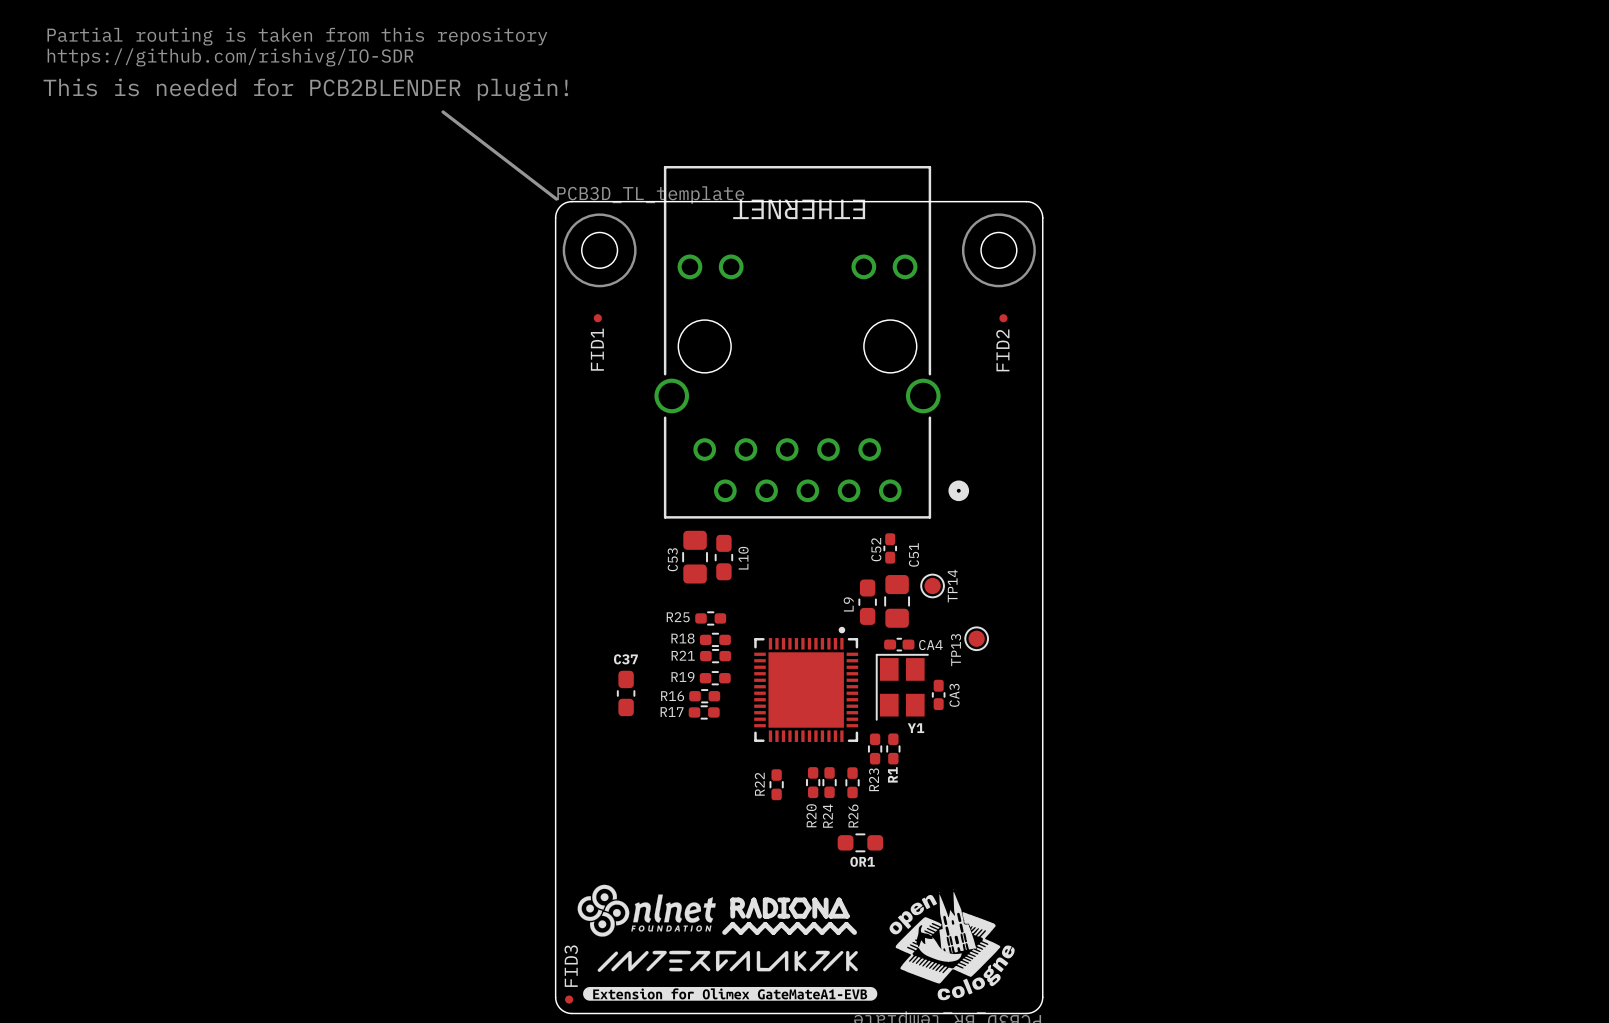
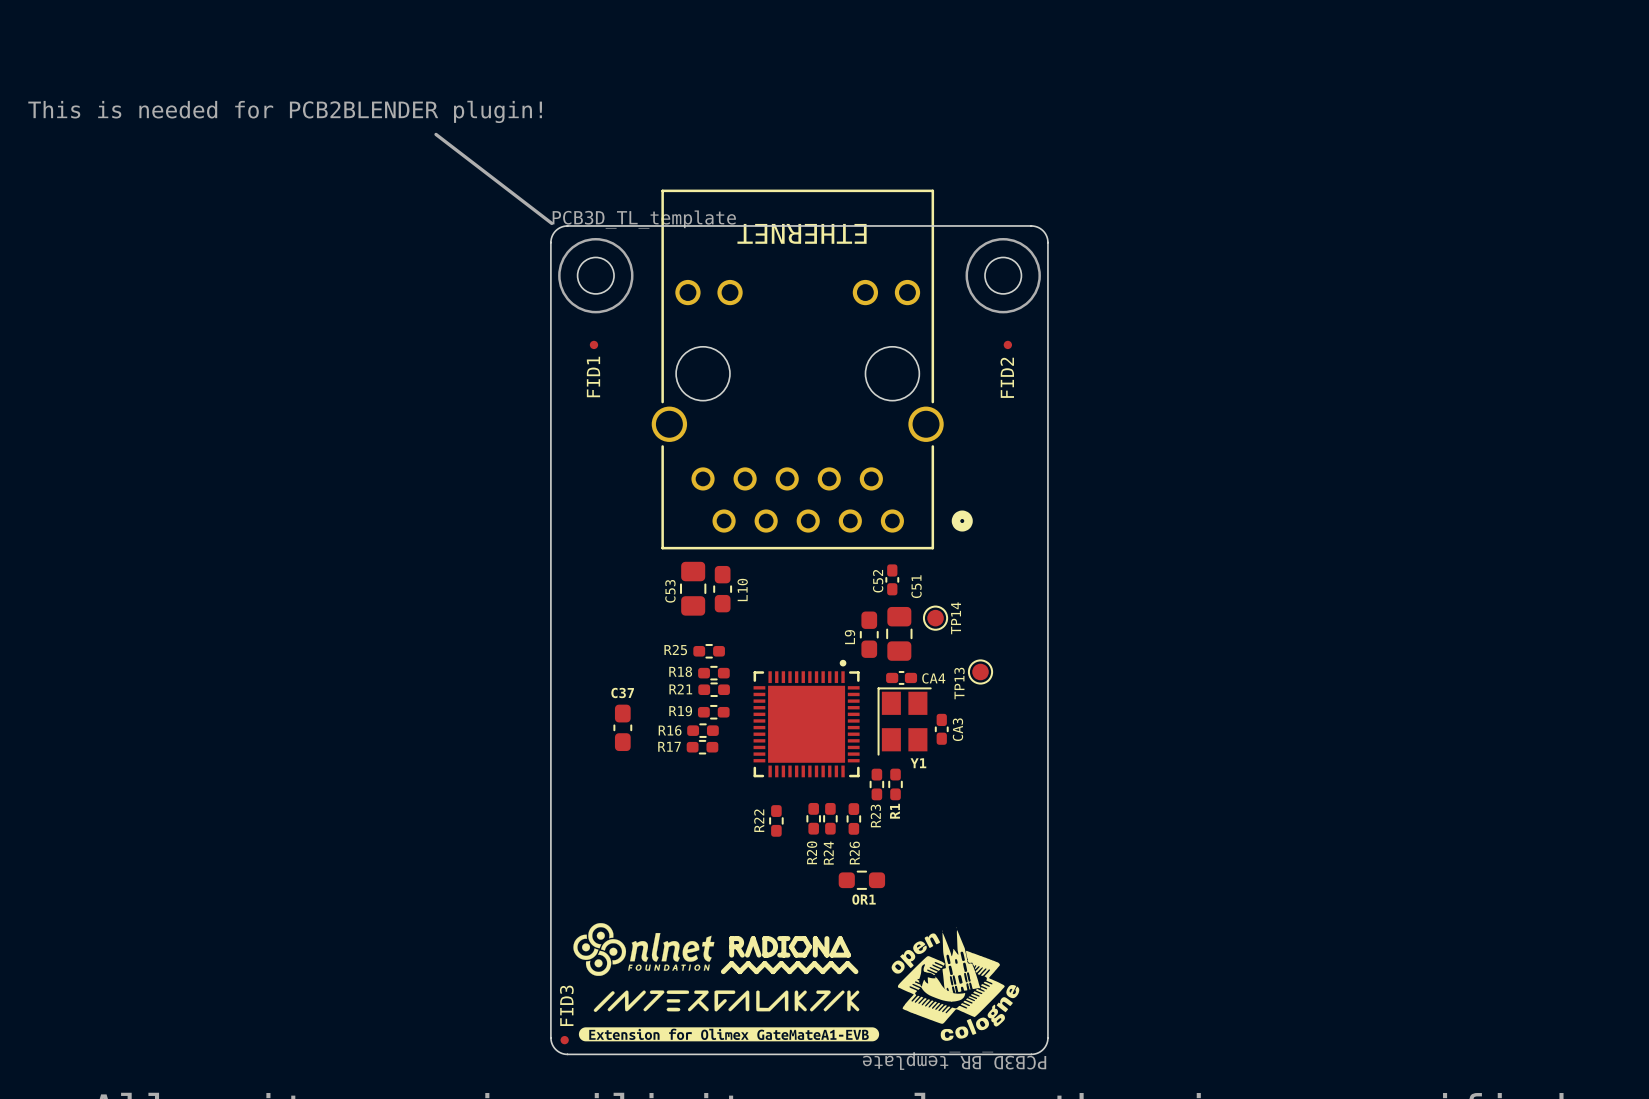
text: Partial routing is taken from this repository (297, 36) -> none
text: https://github.com/rishivg/IO-SDR (230, 57) -> none

